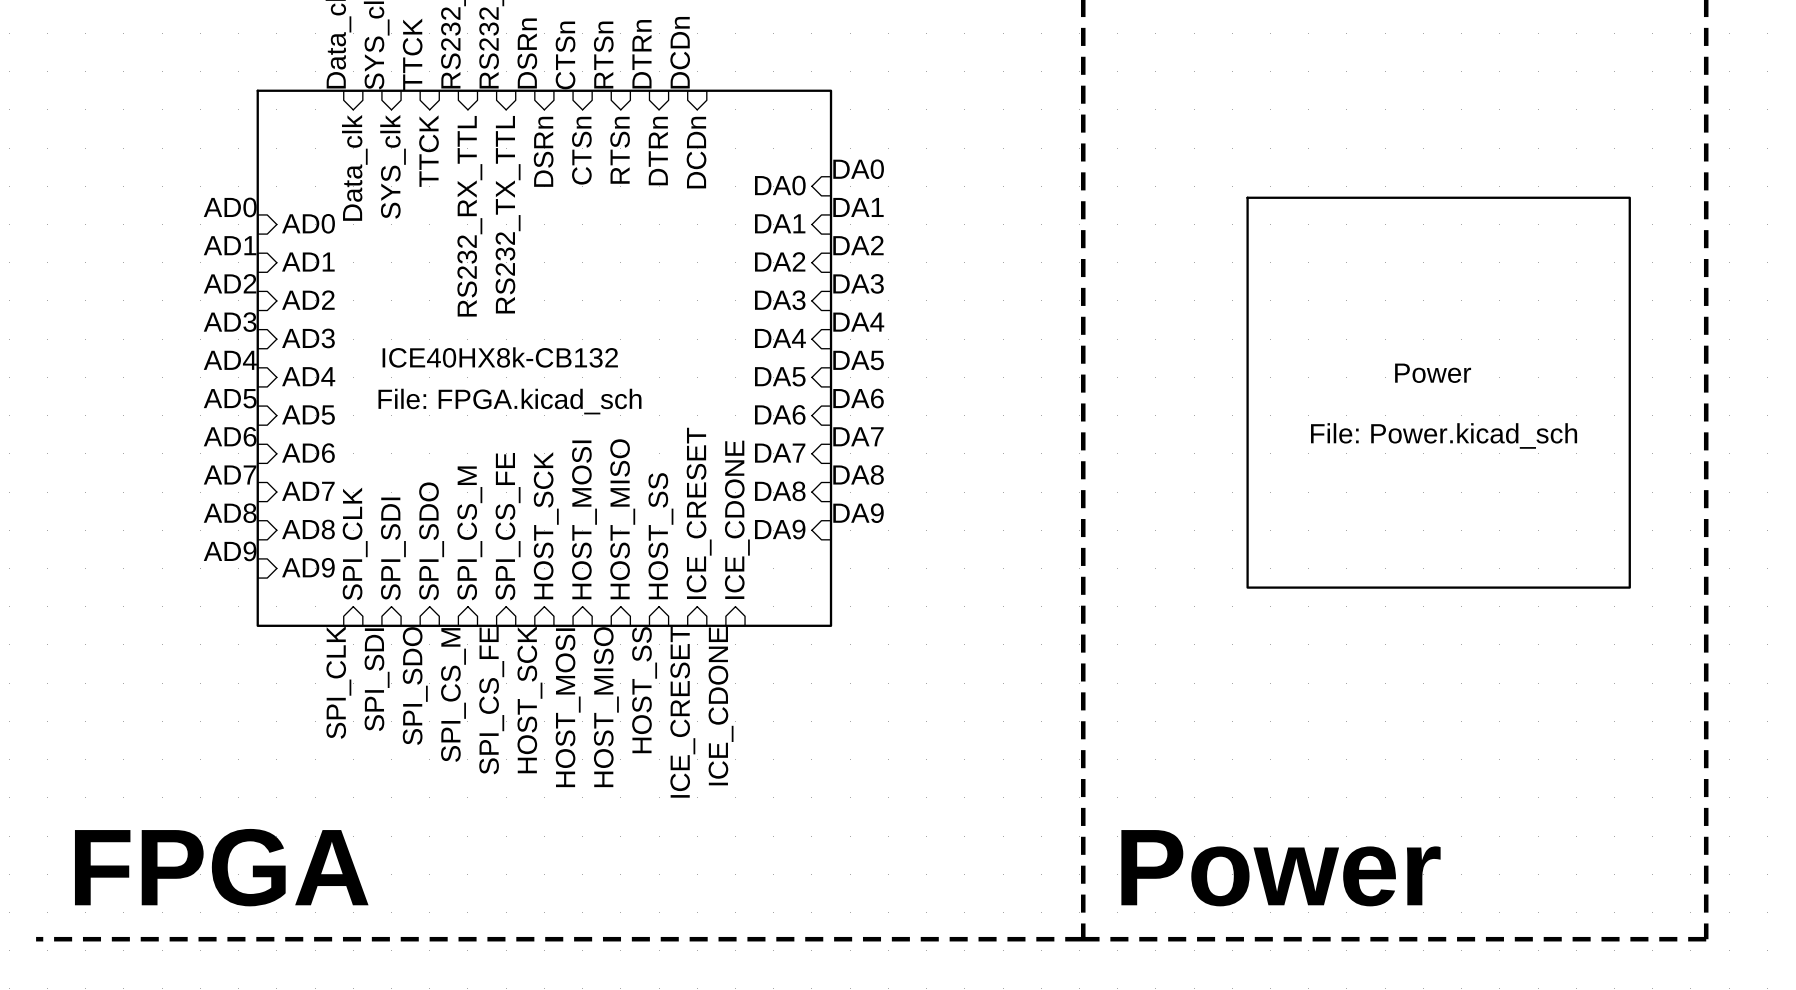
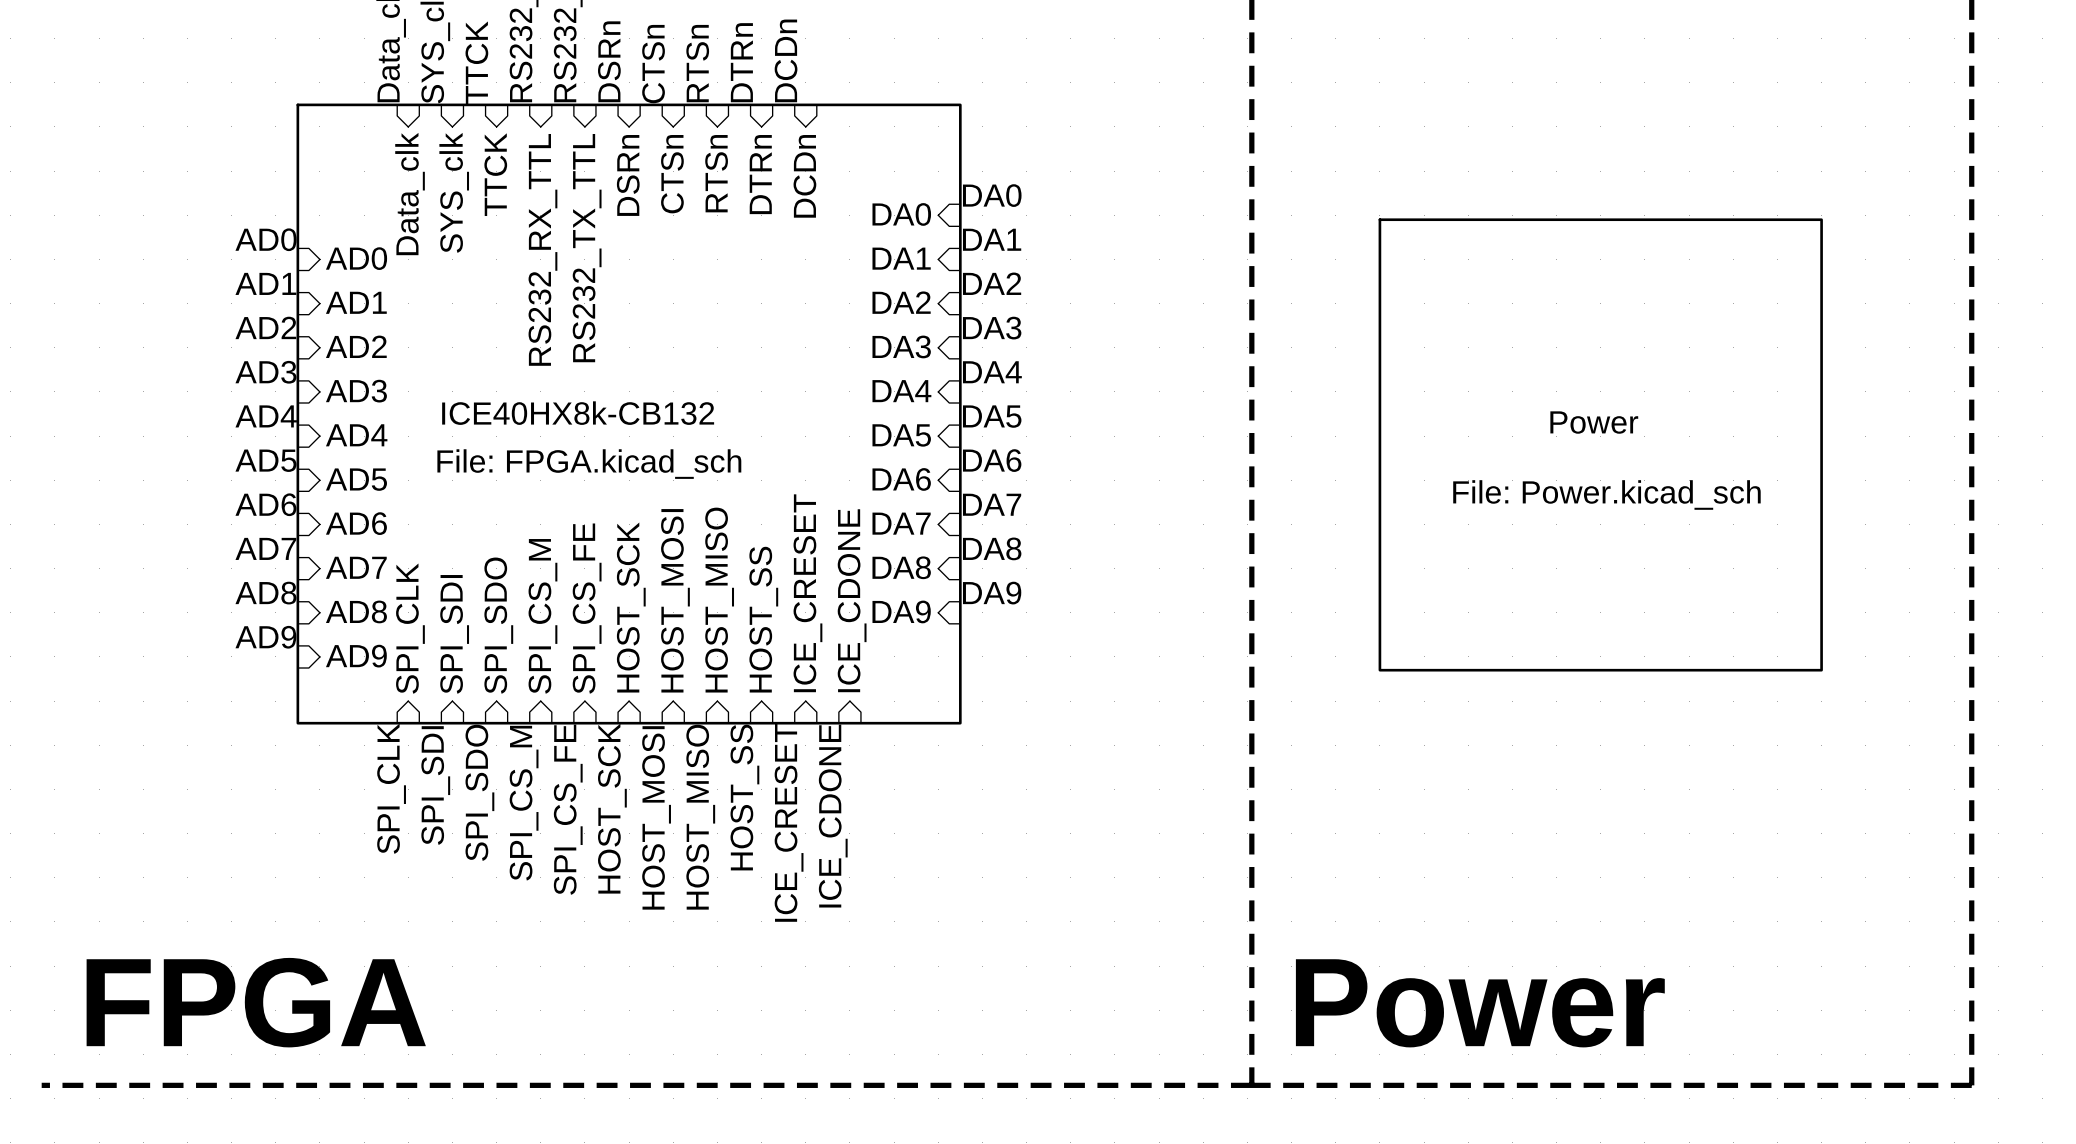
sheet Power position: (1438, 392) -> (1600, 444)

